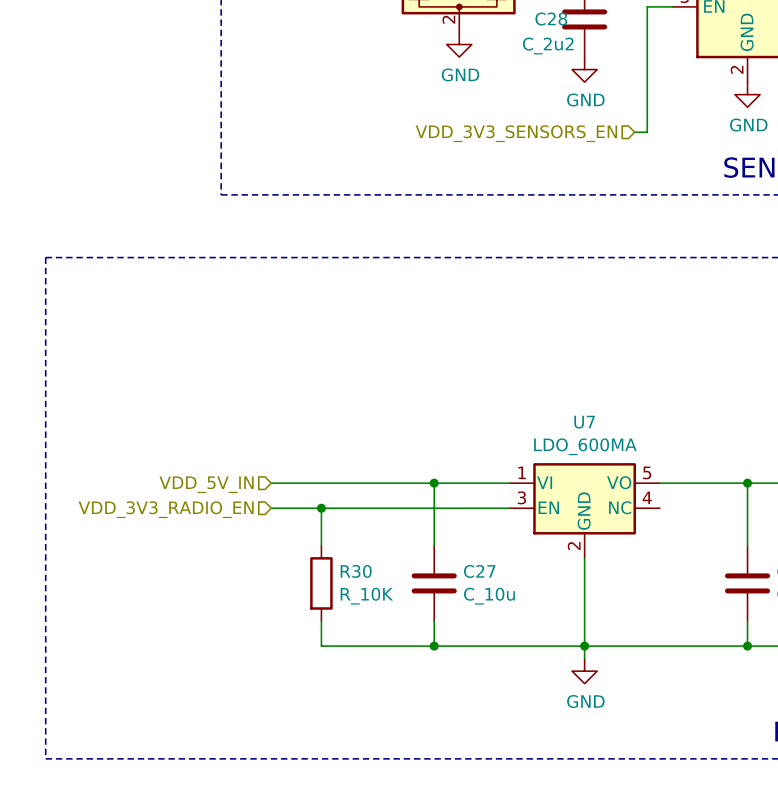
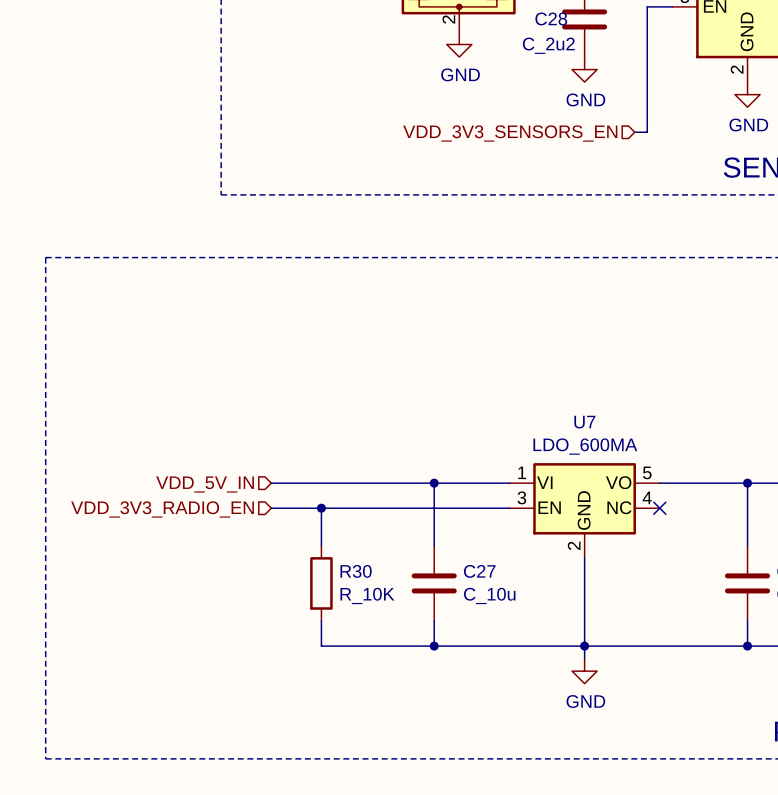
no-connect mark: none -> (659, 508)

